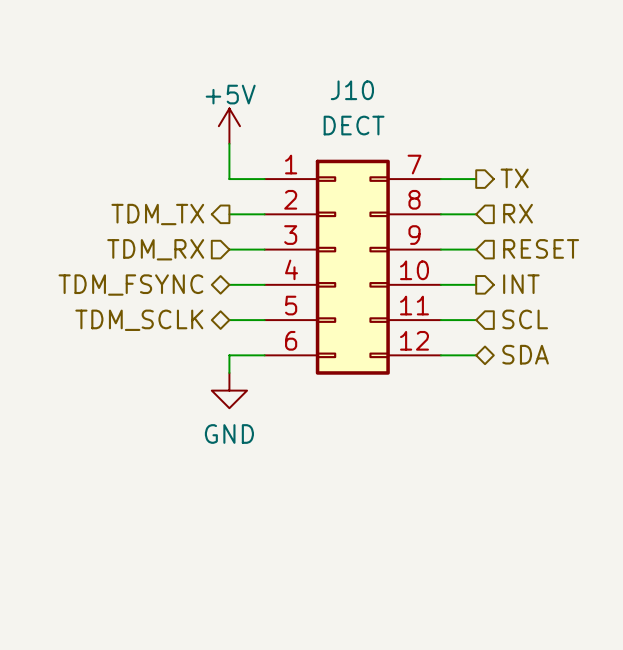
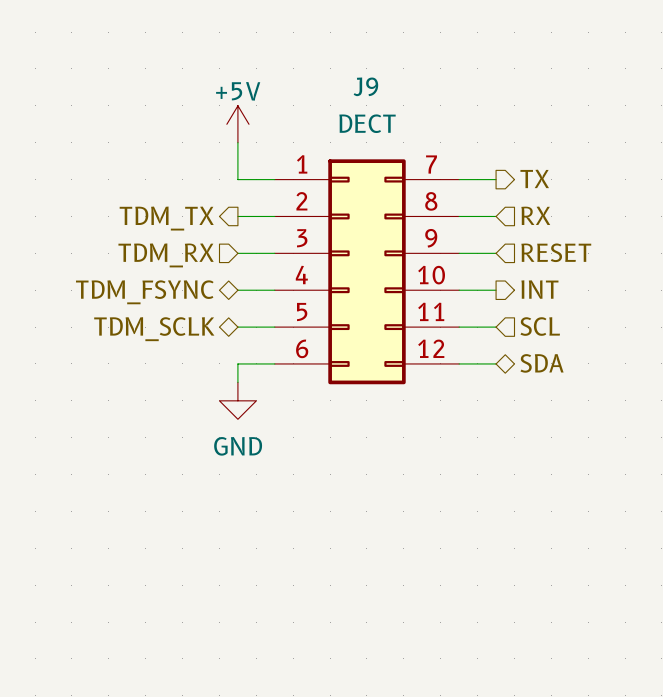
J10 name: J10 (352, 90) -> J9 (365, 86)

